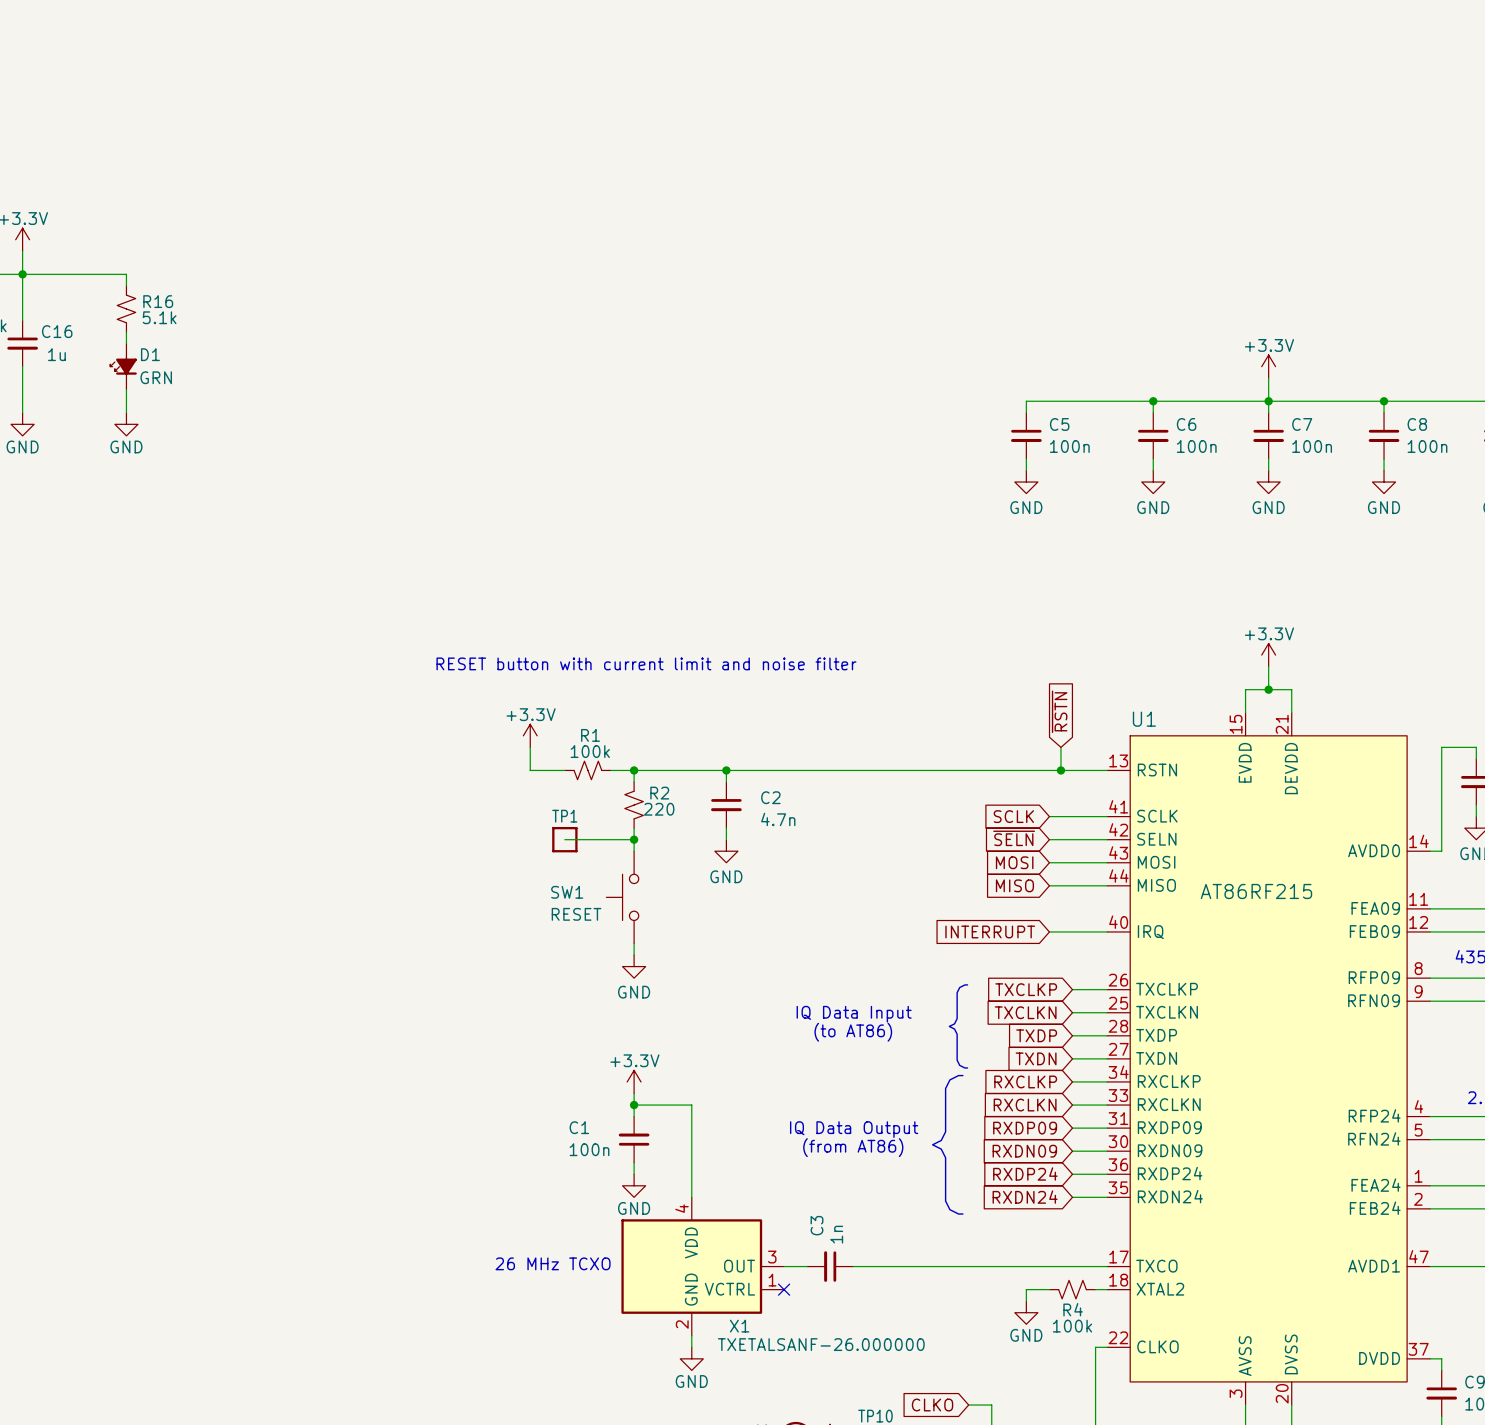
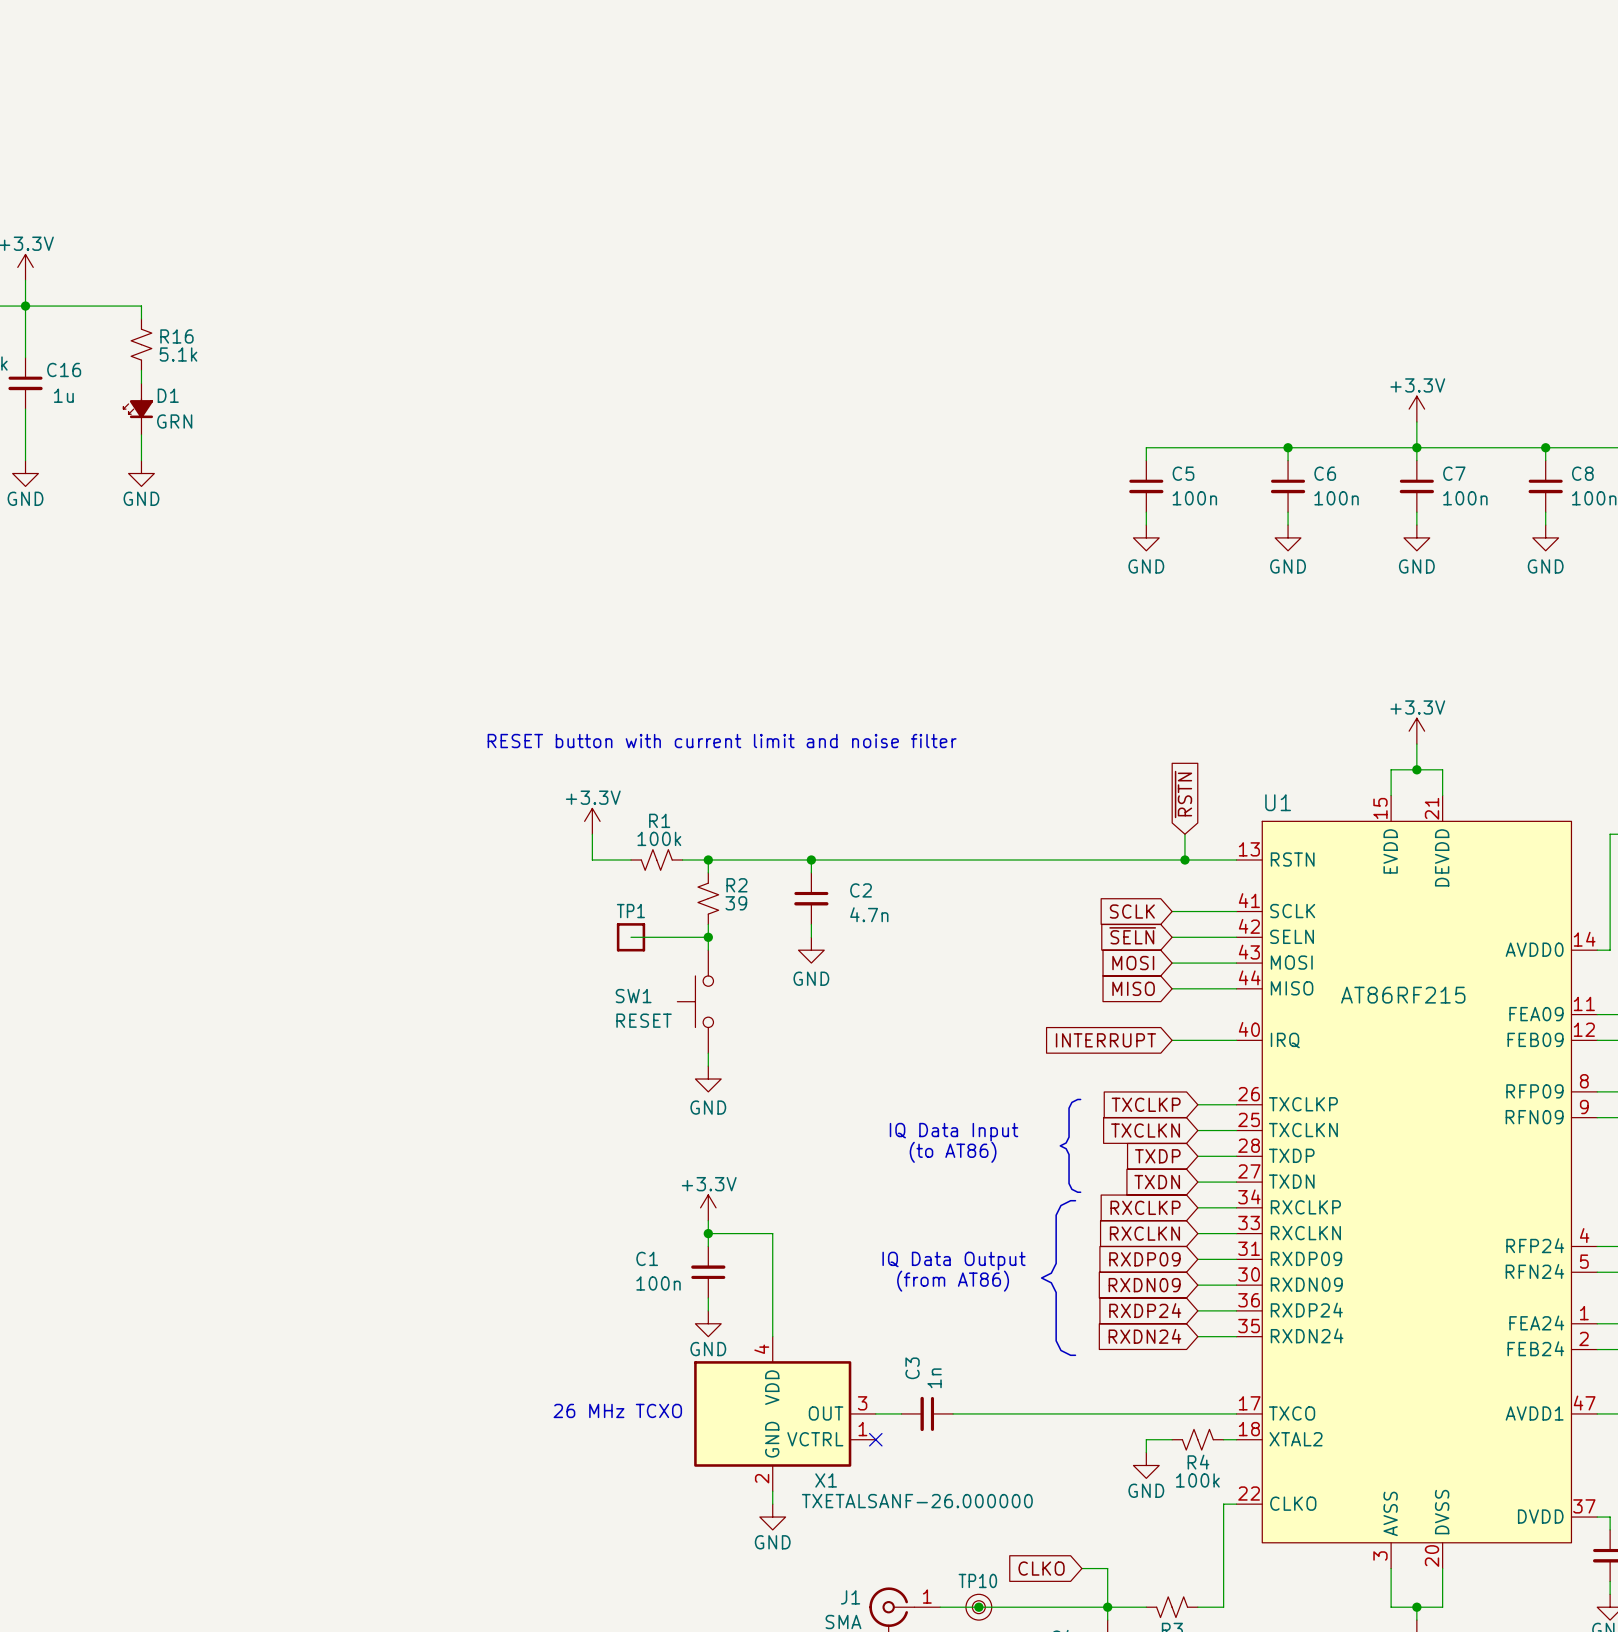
R2 value: 220 (659, 809) -> 39 (736, 903)

